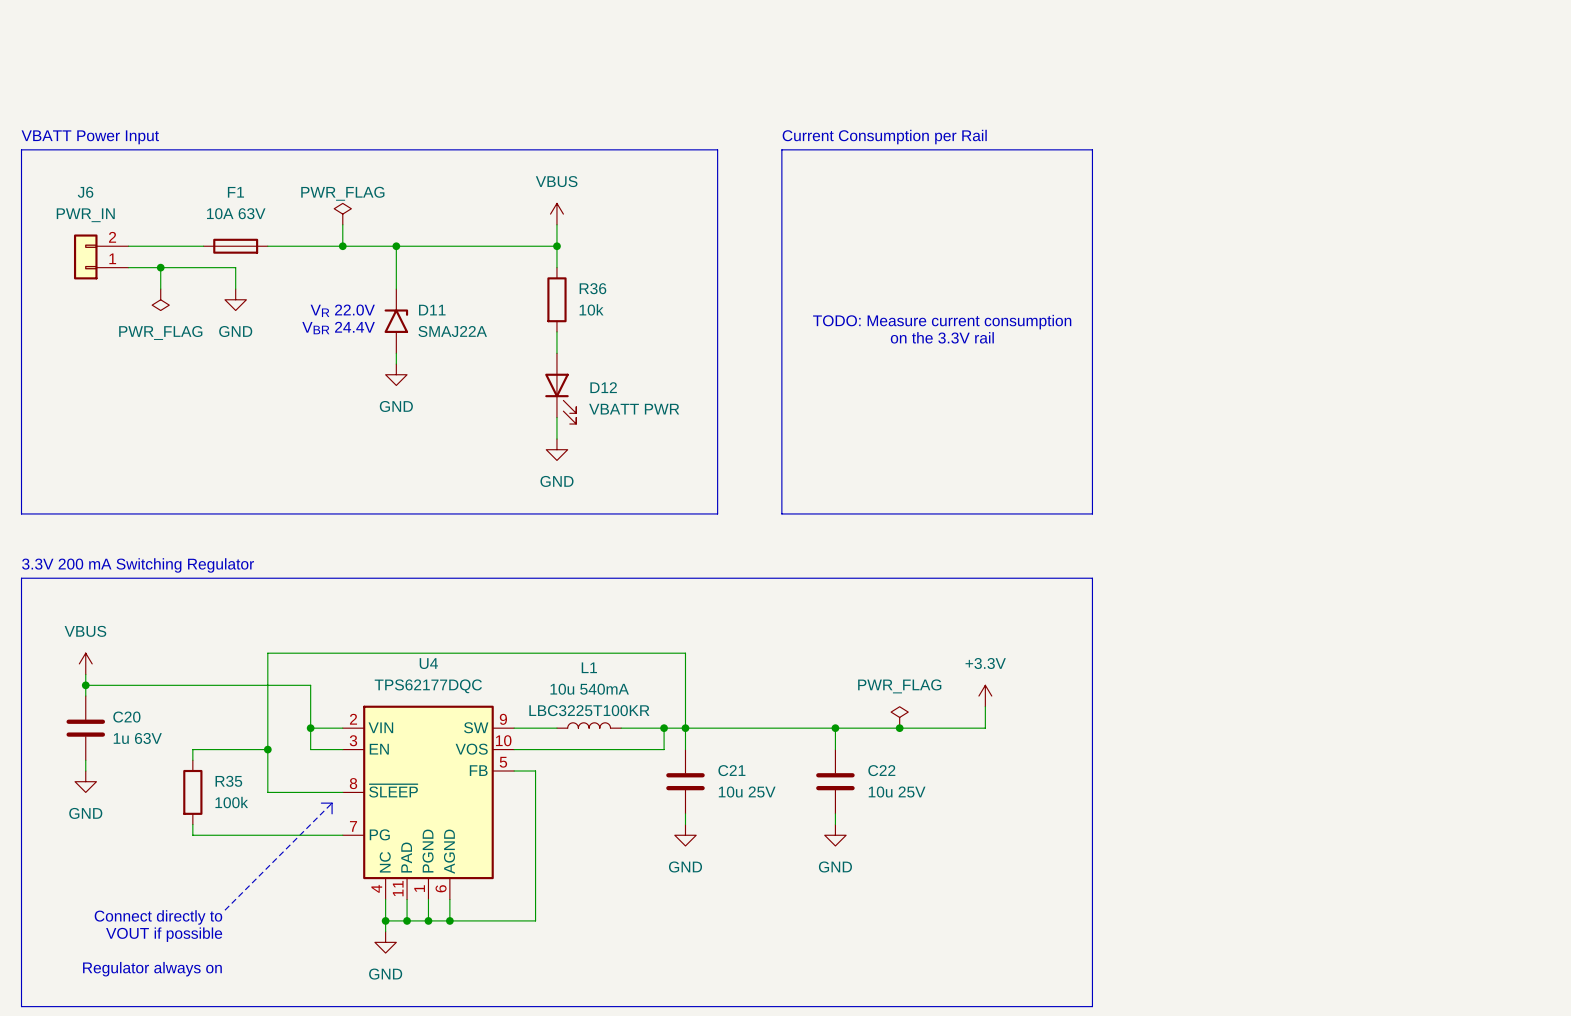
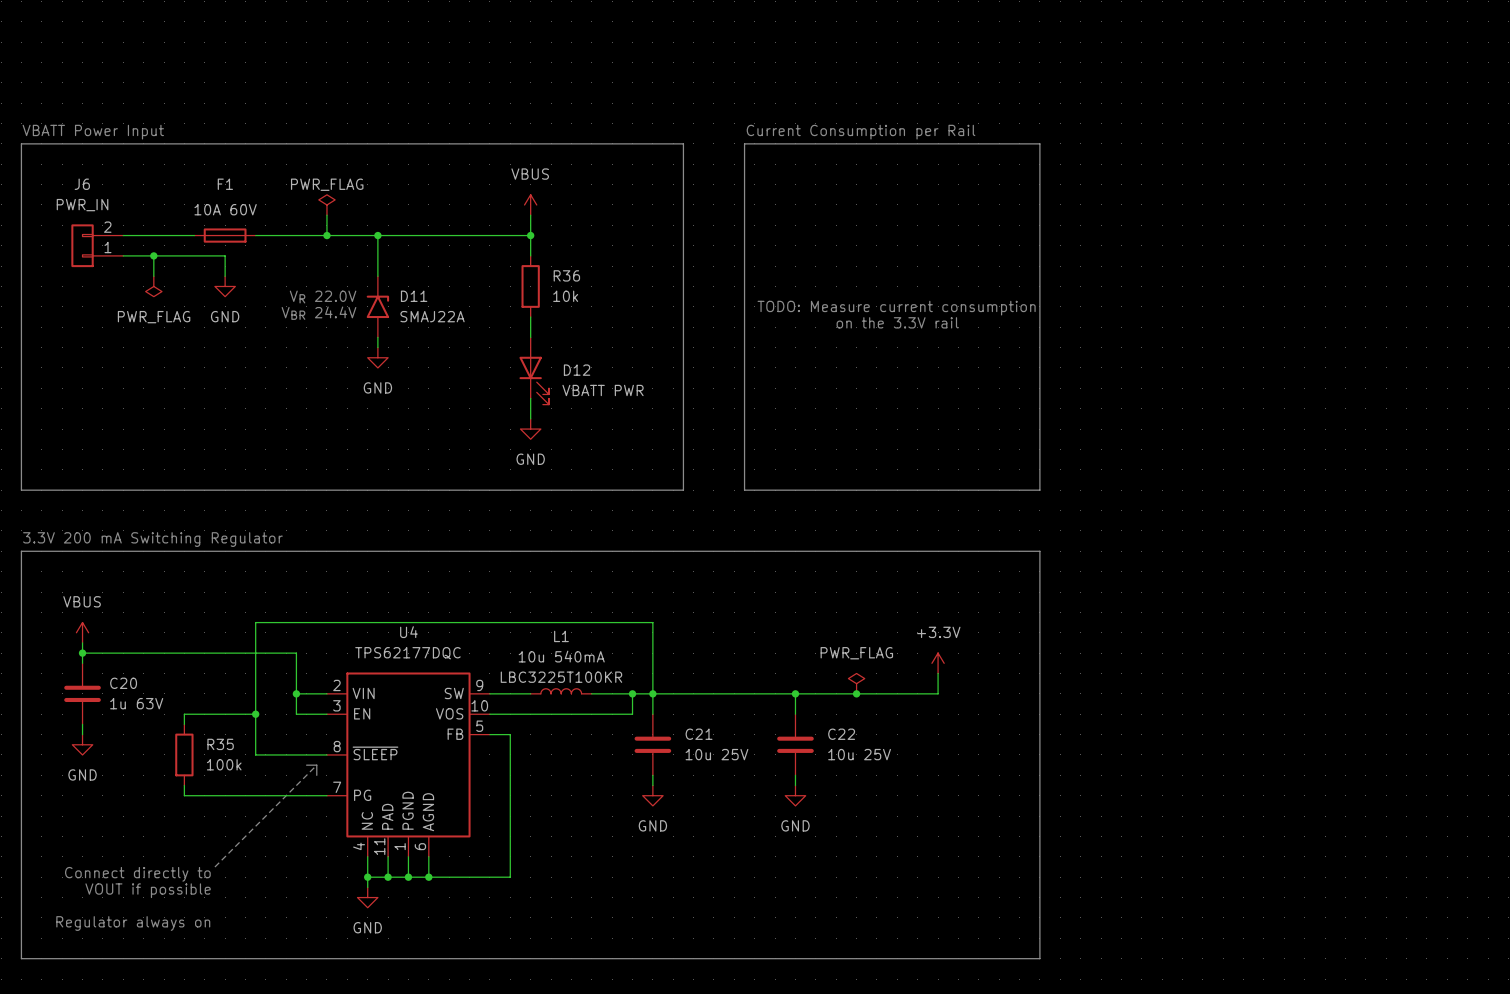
F1 value: 10A 63V (236, 213) -> 10A 60V (225, 209)

